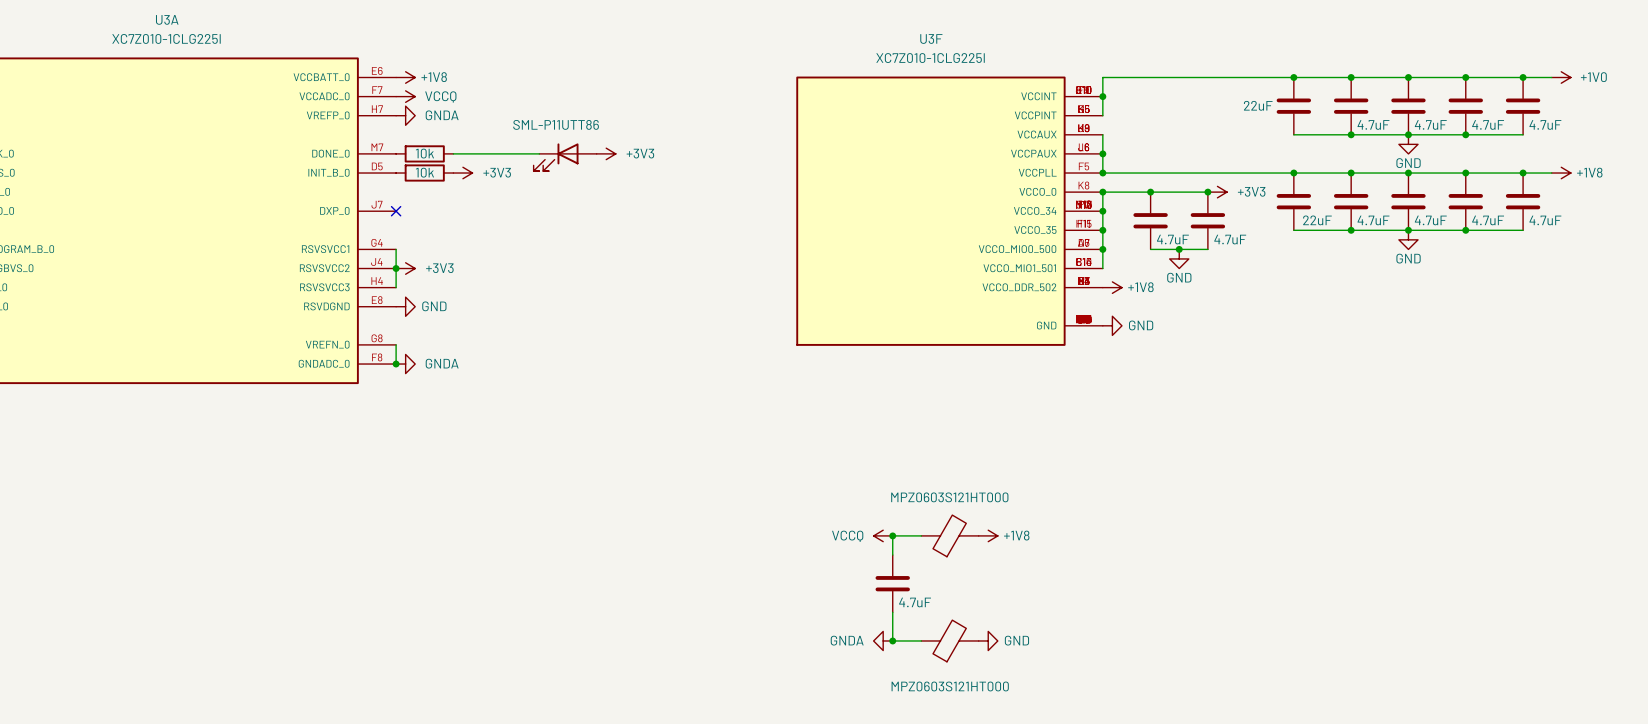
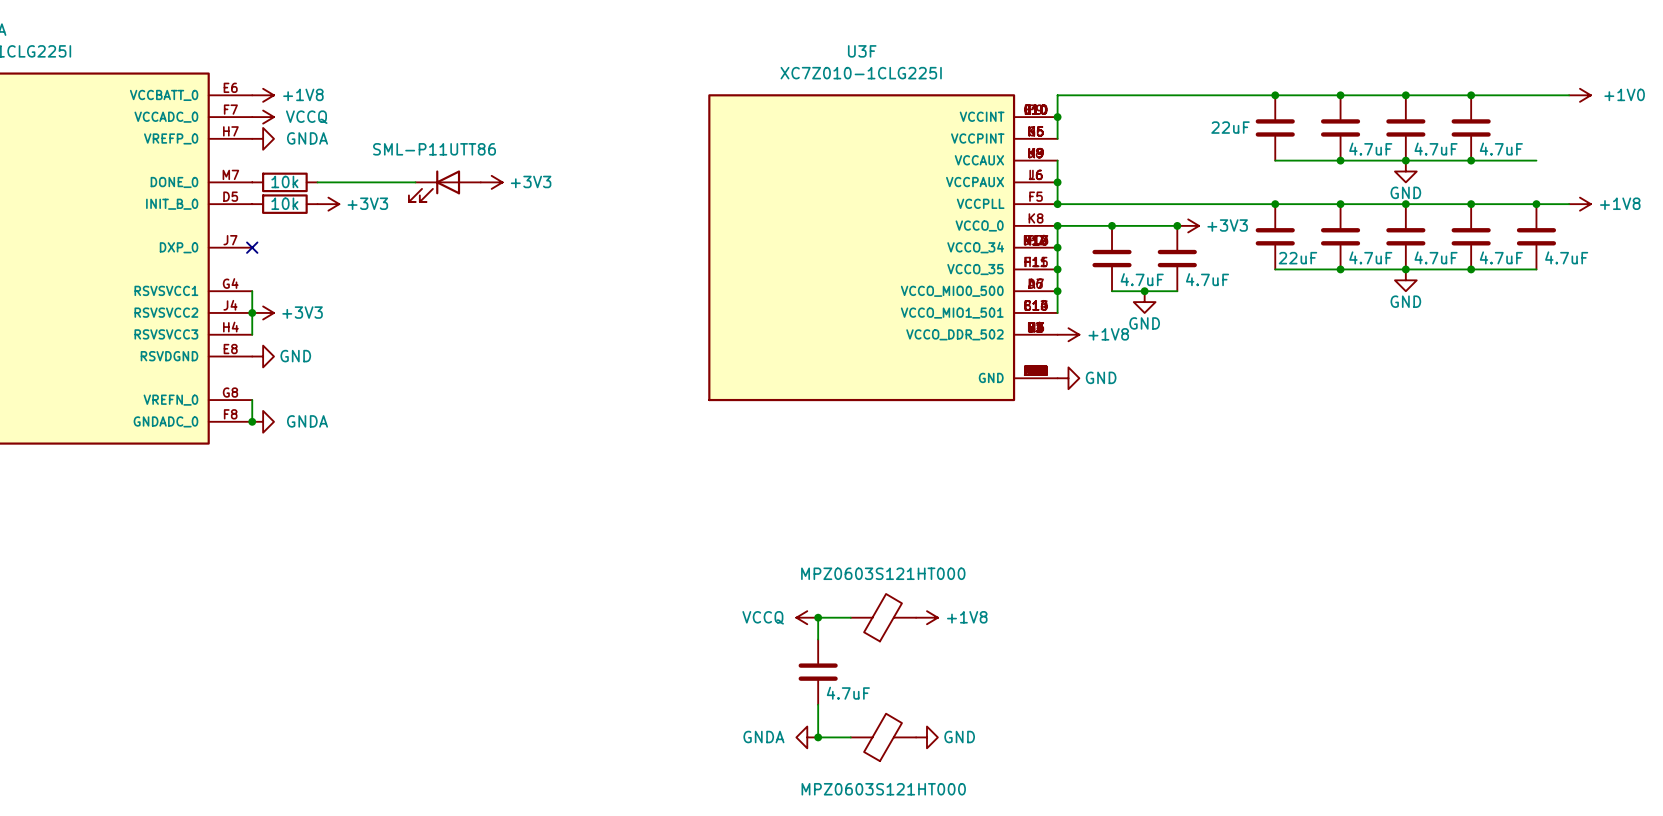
junction: (1523, 77) -> none
part: 4.7uF (1523, 106) -> none

